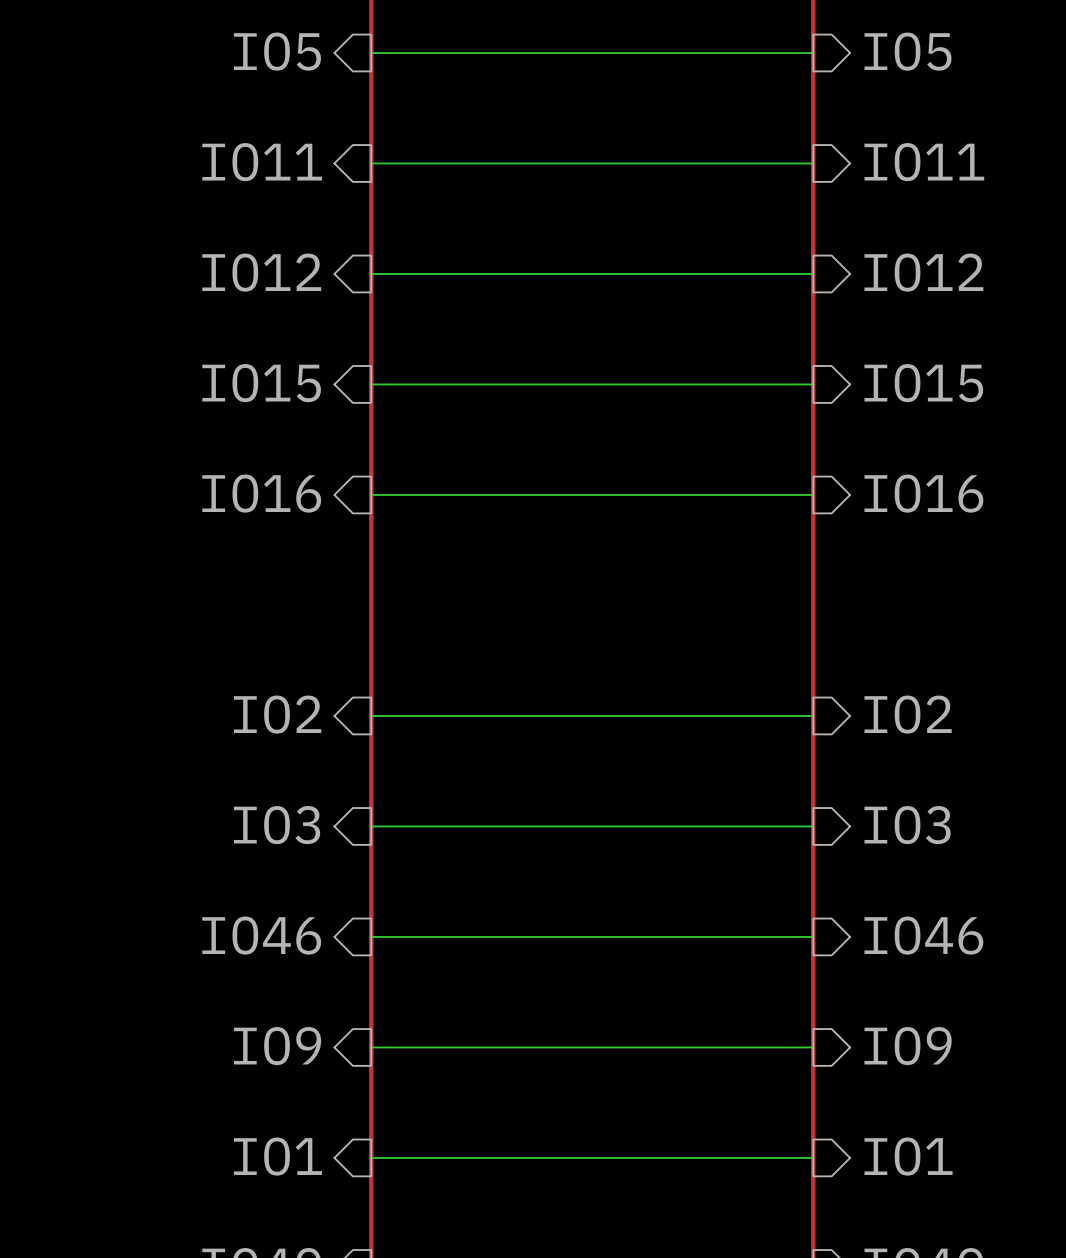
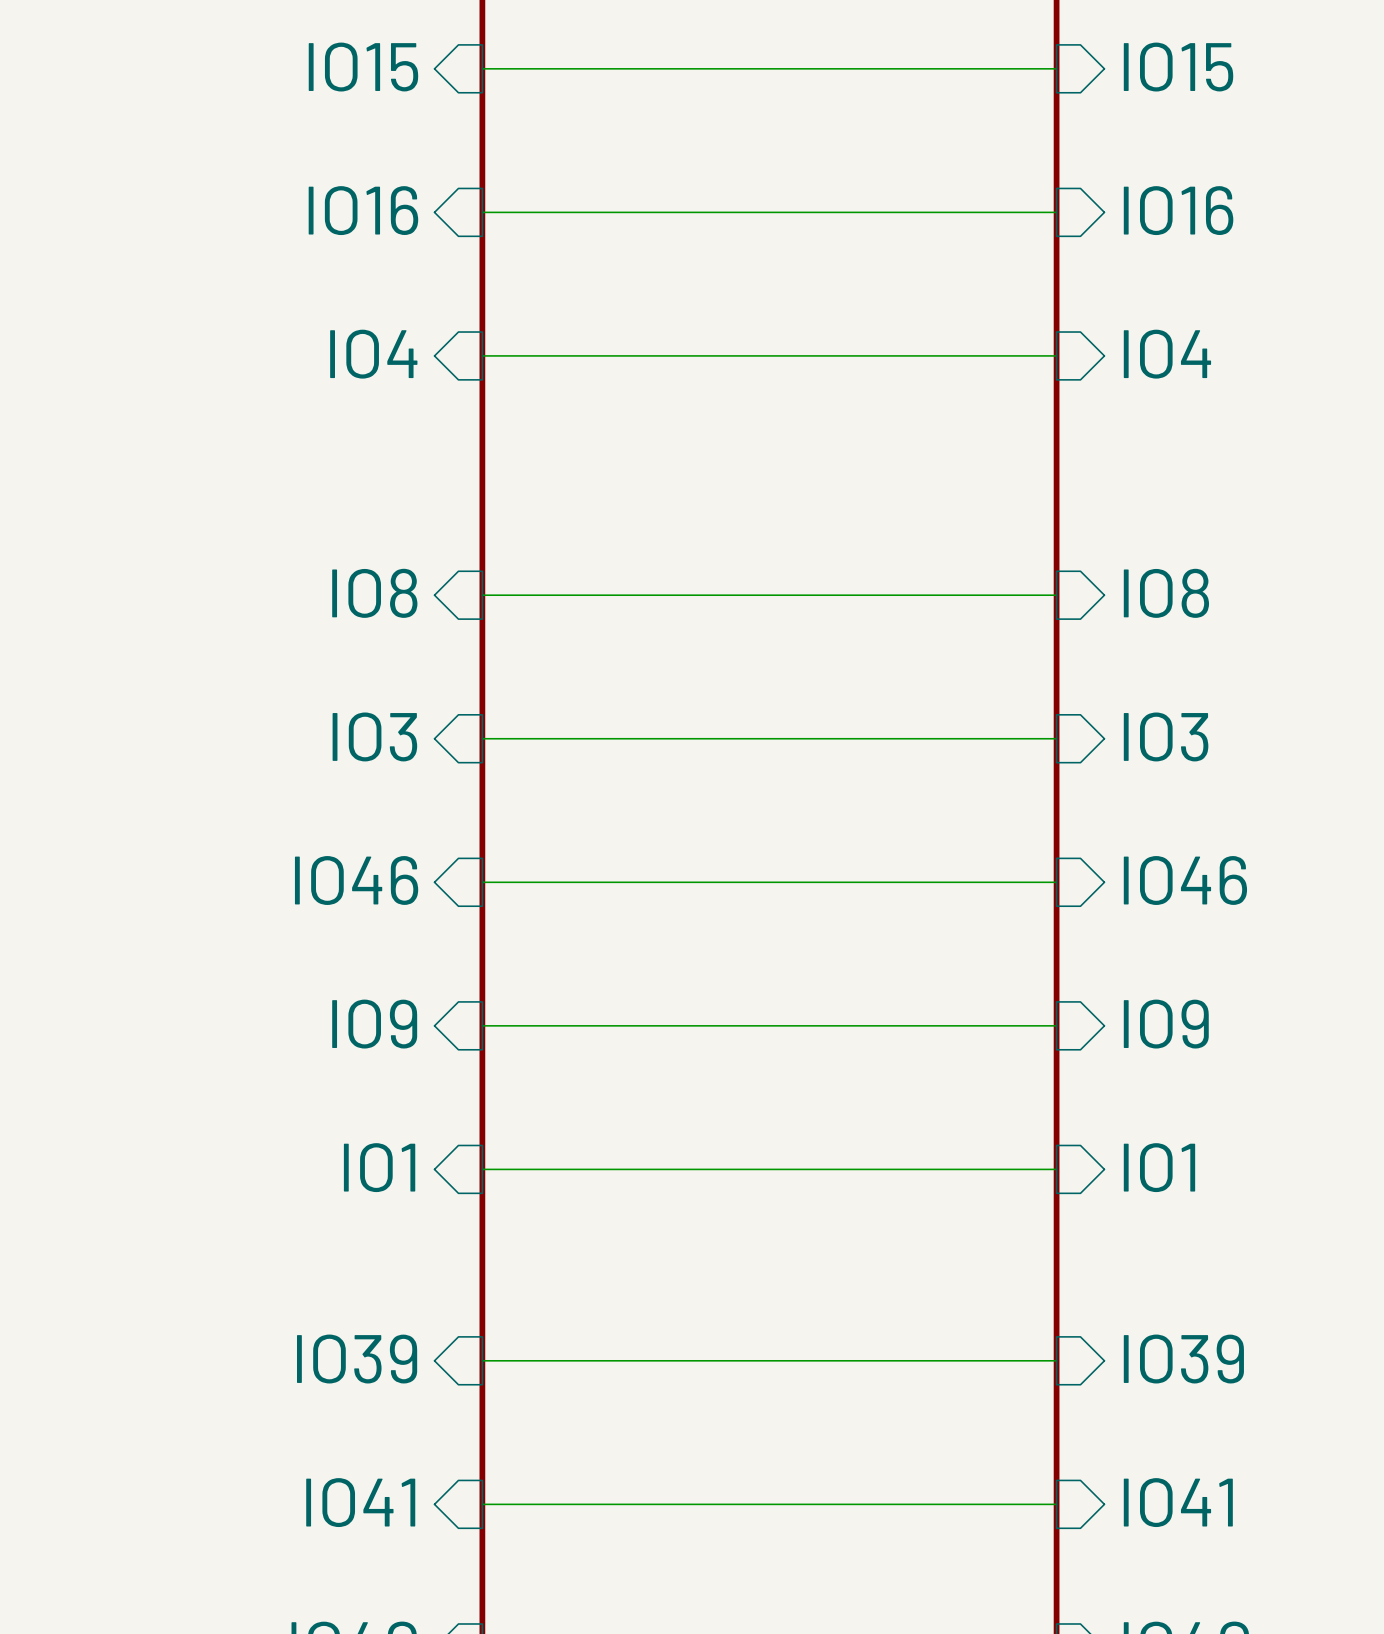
sheet pin: IO5 (277, 51) -> IO15 (363, 67)
sheet pin: IO5 (908, 51) -> IO15 (1178, 67)
sheet pin: IO11 (262, 162) -> IO16 (363, 210)
sheet pin: IO11 (924, 162) -> IO16 (1178, 210)
sheet pin: IO12 (261, 272) -> IO4 (373, 354)
sheet pin: IO12 (923, 272) -> IO4 (1167, 354)
sheet pin: IO15 (261, 383) -> none
sheet pin: IO15 (923, 383) -> none
wire: (371, 384) (813, 384) -> (482, 738) (1056, 738)
sheet pin: none -> IO8 (374, 593)
sheet pin: none -> IO8 (1166, 593)
sheet pin: IO16 (261, 493) -> none
sheet pin: IO16 (923, 493) -> none
wire: (371, 494) (813, 494) -> (482, 595) (1056, 595)
sheet pin: IO2 (277, 714) -> IO9 (374, 1024)
sheet pin: IO2 (908, 714) -> IO9 (1166, 1024)
wire: (371, 715) (813, 715) -> (482, 882) (1056, 882)
sheet pin position: IO3 (277, 825) -> IO3 (374, 736)
sheet pin position: IO3 (907, 825) -> IO3 (1166, 736)
wire: (371, 826) (813, 826) -> (482, 1025) (1056, 1025)
sheet pin: none -> IO1 (379, 1167)
sheet pin: none -> IO1 (1159, 1167)
sheet pin position: IO46 (261, 935) -> IO46 (356, 880)
sheet pin position: IO46 (923, 935) -> IO46 (1185, 880)
wire: (371, 936) (813, 936) -> (482, 1169) (1056, 1169)
sheet pin: IO9 (277, 1046) -> IO39 (357, 1359)
sheet pin: IO9 (908, 1046) -> IO39 (1183, 1359)
sheet pin: IO1 (278, 1156) -> IO41 (360, 1502)
sheet pin: IO1 (908, 1156) -> IO41 (1178, 1502)

